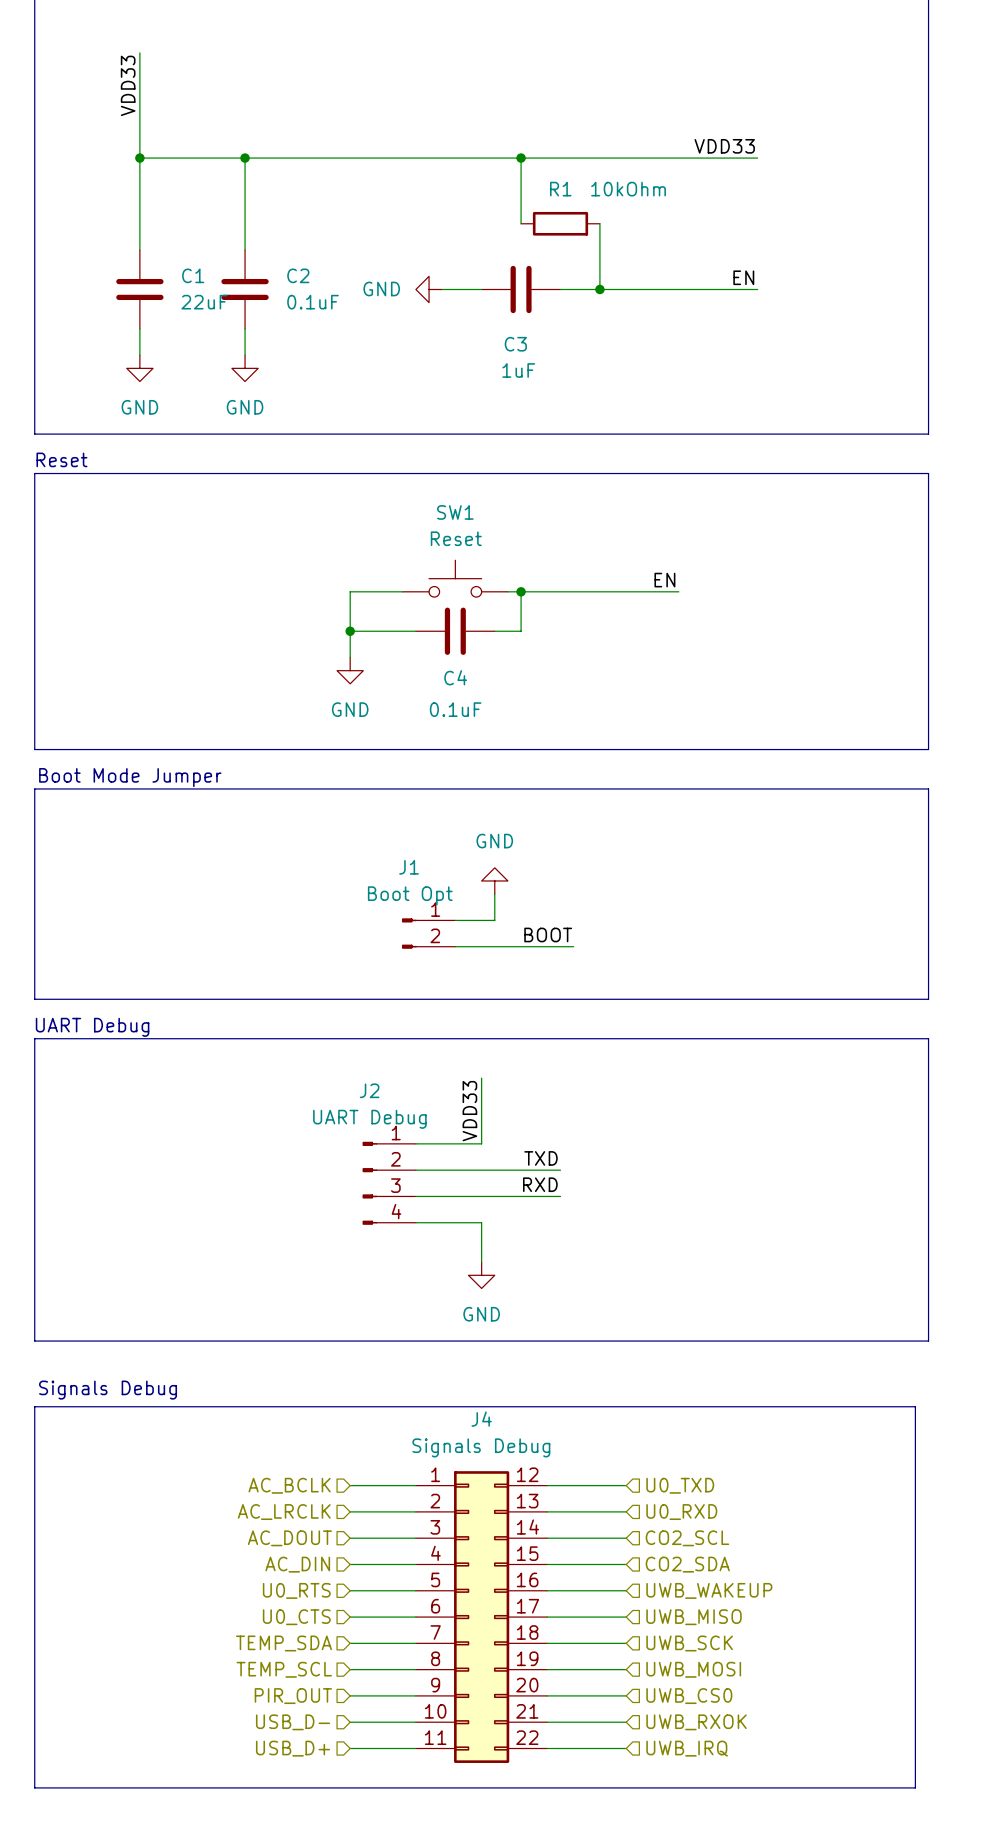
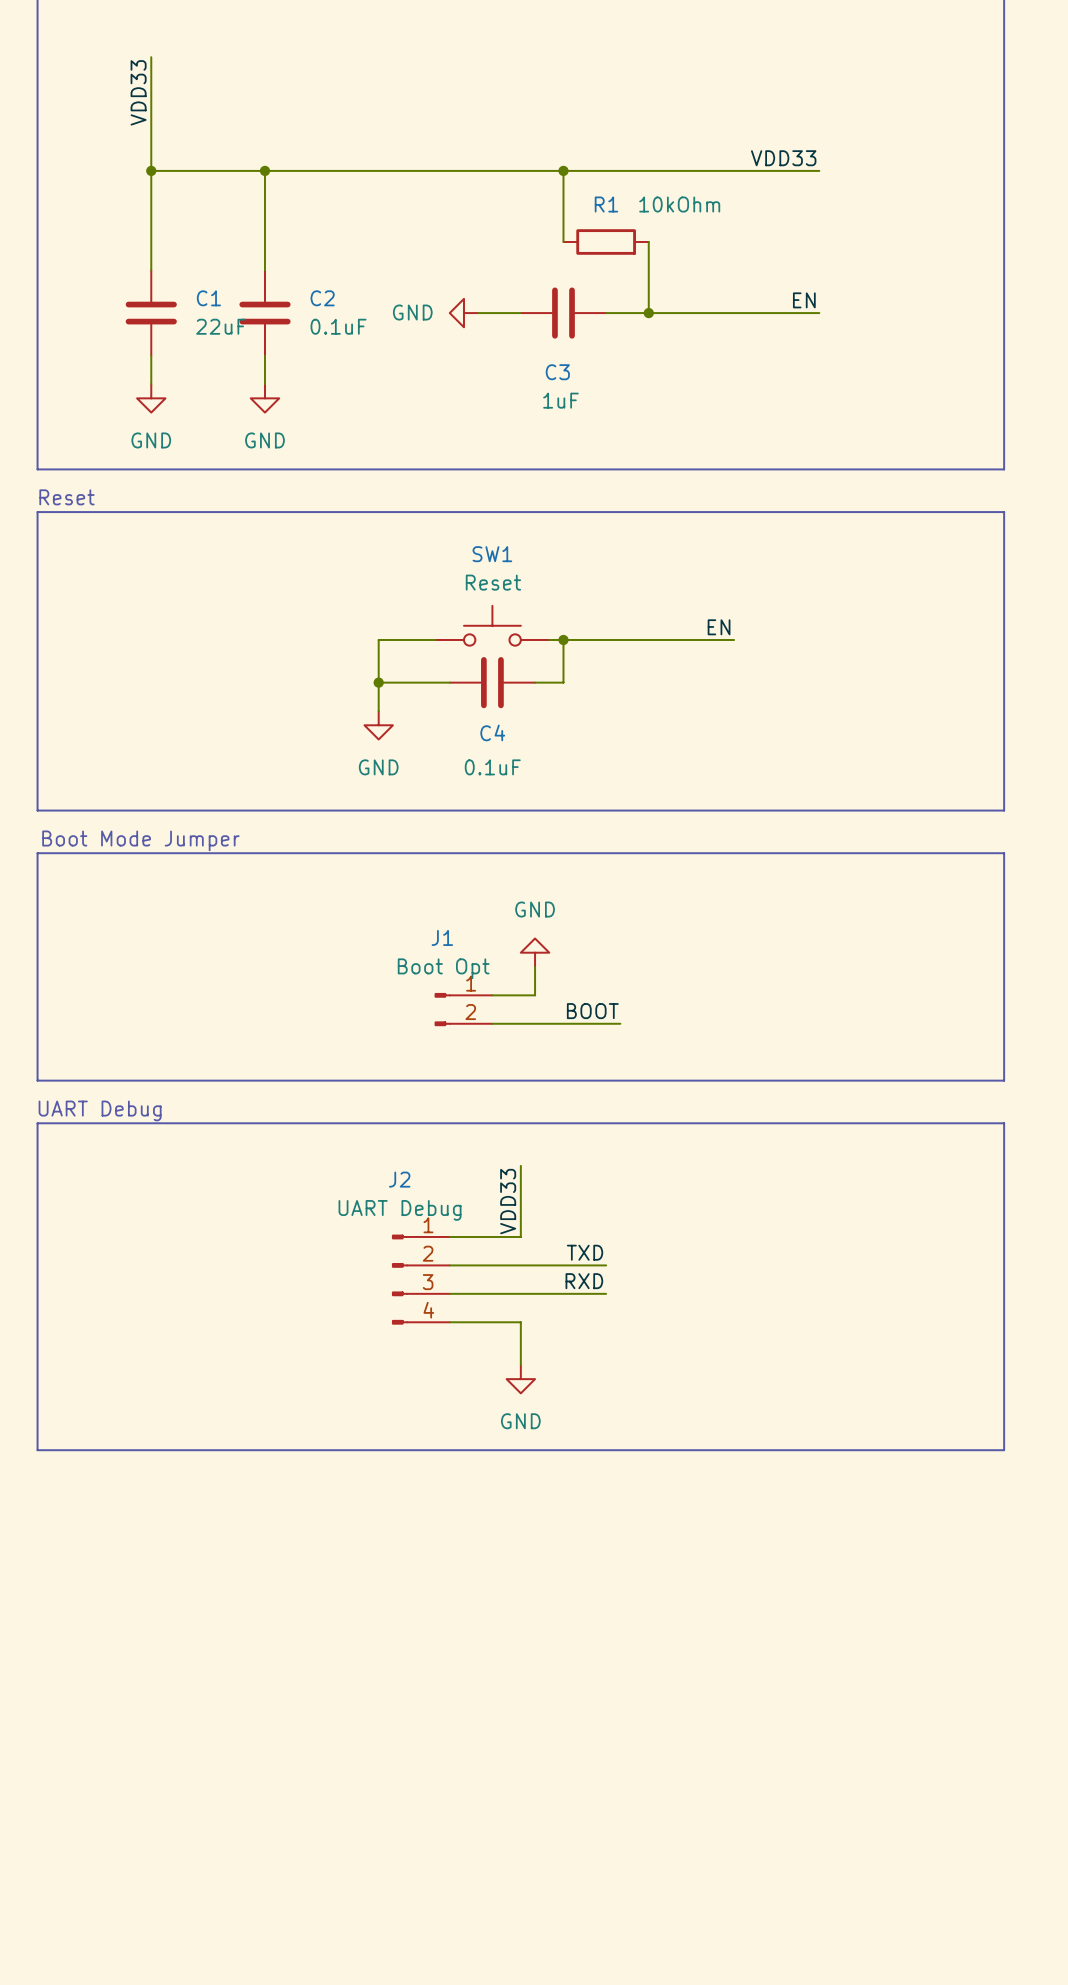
text: Signals Debug (108, 1390) -> none
line: (34, 1406) (915, 1406) (915, 1787) (34, 1787) (34, 1406) -> none
hierarchical label: AC_BCLK (289, 1485) -> none
wire: (350, 1485) (415, 1485) -> none
wire: (547, 1485) (626, 1485) -> none
hierarchical label: U0_TXD (680, 1485) -> none
wire: (350, 1511) (415, 1511) -> none
wire: (547, 1511) (626, 1511) -> none
hierarchical label: AC_LRCLK (284, 1512) -> none
hierarchical label: U0_RXD (681, 1512) -> none
hierarchical label: AC_DOUT (289, 1538) -> none
wire: (350, 1538) (415, 1538) -> none
wire: (547, 1538) (626, 1538) -> none
hierarchical label: CO2_SCL (687, 1538) -> none
hierarchical label: AC_DIN (297, 1564) -> none
wire: (350, 1564) (415, 1564) -> none
wire: (547, 1564) (626, 1564) -> none
hierarchical label: CO2_SDA (687, 1564) -> none
hierarchical label: U0_RTS (296, 1590) -> none
wire: (350, 1590) (415, 1590) -> none
wire: (547, 1590) (626, 1590) -> none
hierarchical label: UWB_WAKEUP (709, 1590) -> none
hierarchical label: U0_CTS (296, 1617) -> none
wire: (350, 1617) (415, 1617) -> none
J4: Signals Debug (481, 1617) -> none
wire: (547, 1617) (626, 1617) -> none
hierarchical label: UWB_MISO (694, 1617) -> none
hierarchical label: TEMP_SDA (283, 1643) -> none
wire: (350, 1643) (415, 1643) -> none
wire: (547, 1643) (626, 1643) -> none
hierarchical label: UWB_SCK (689, 1643) -> none
hierarchical label: TEMP_SCL (284, 1669) -> none
wire: (350, 1669) (415, 1669) -> none
wire: (547, 1669) (626, 1669) -> none
hierarchical label: UWB_MOSI (693, 1669) -> none
wire: (350, 1695) (415, 1695) -> none
wire: (547, 1695) (626, 1695) -> none
hierarchical label: PIR_OUT (293, 1696) -> none
hierarchical label: UWB_CS0 (689, 1696) -> none
hierarchical label: USB_D- (293, 1722) -> none
wire: (350, 1722) (415, 1722) -> none
wire: (547, 1722) (626, 1722) -> none
hierarchical label: UWB_RXOK (696, 1722) -> none
hierarchical label: USB_D+ (293, 1748) -> none
wire: (350, 1748) (415, 1748) -> none
wire: (547, 1748) (626, 1748) -> none
hierarchical label: UWB_IRQ (687, 1748) -> none

